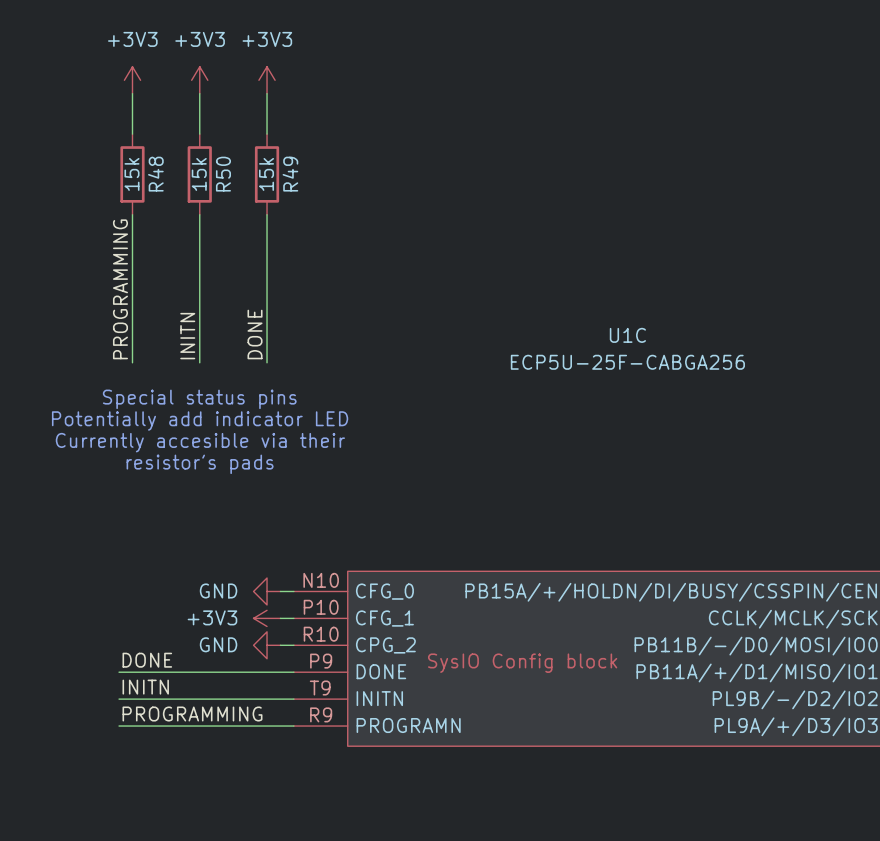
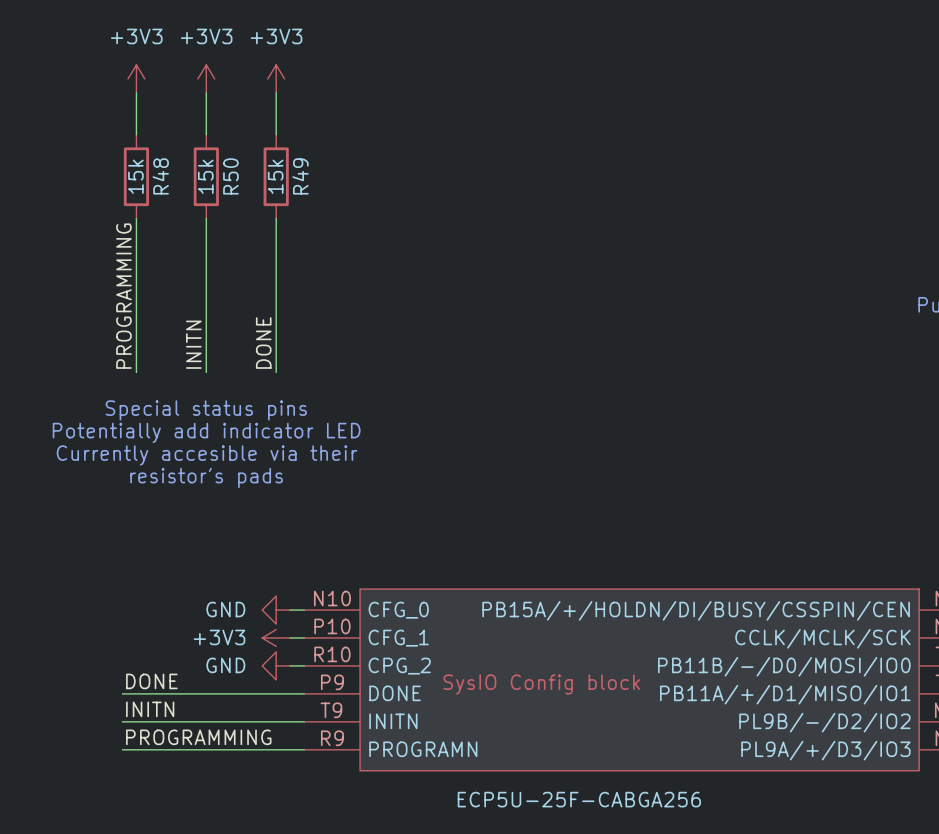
U1C name: U1C (627, 335) -> none
U1C value position: ECP5U-25F-CABGA256 (627, 362) -> ECP5U-25F-CABGA256 (579, 799)

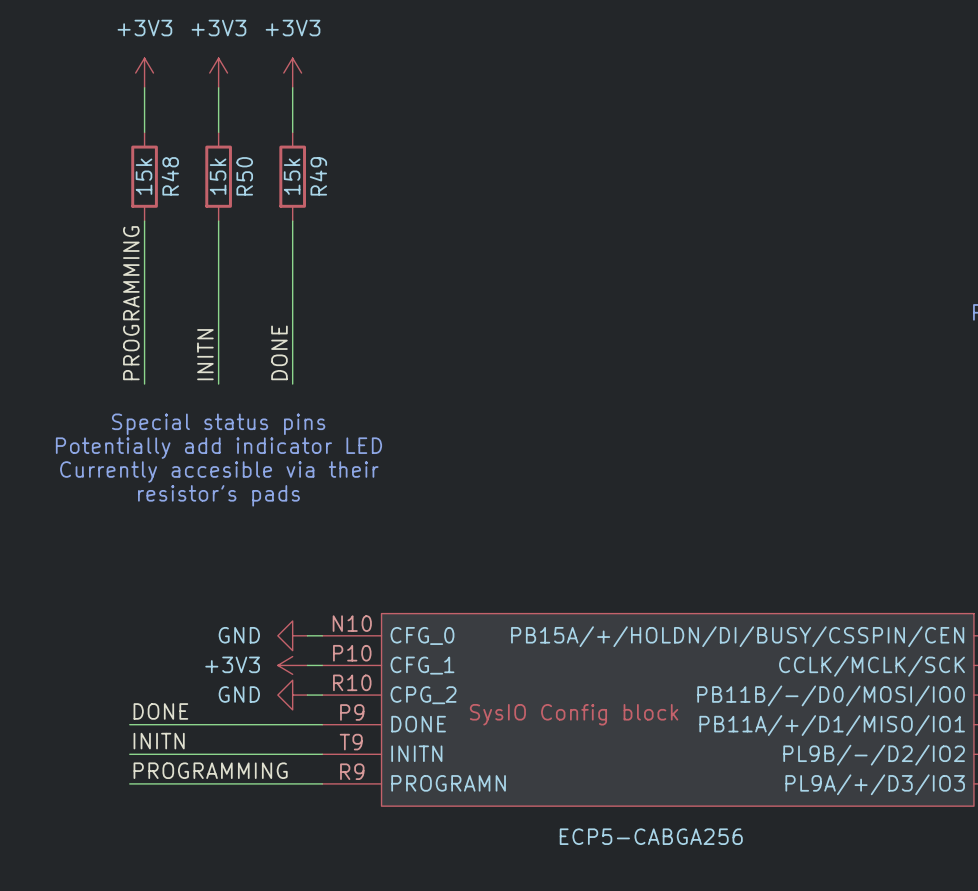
part value: ECP5U-25F-CABGA256 (579, 799) -> ECP5-CABGA256 (651, 836)

